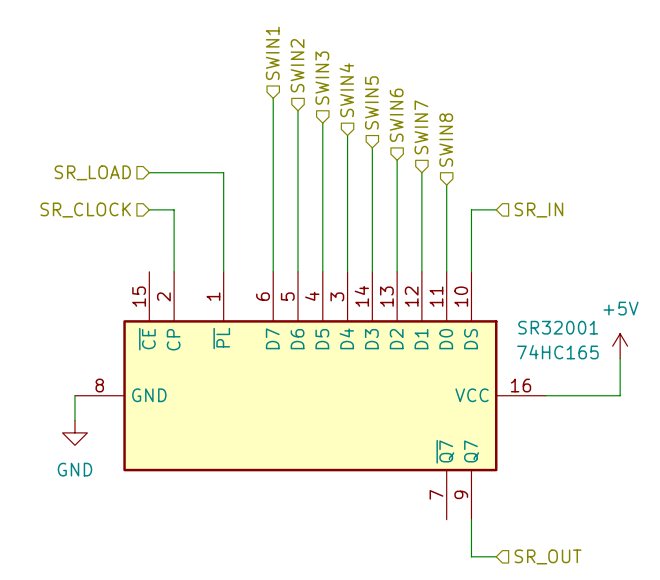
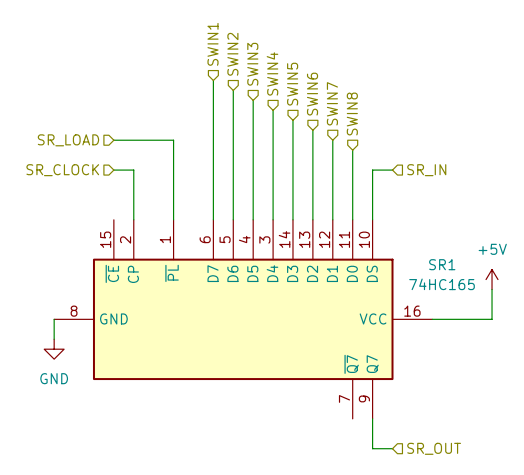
SR32001 name: SR32001 (558, 327) -> SR1 (442, 264)

